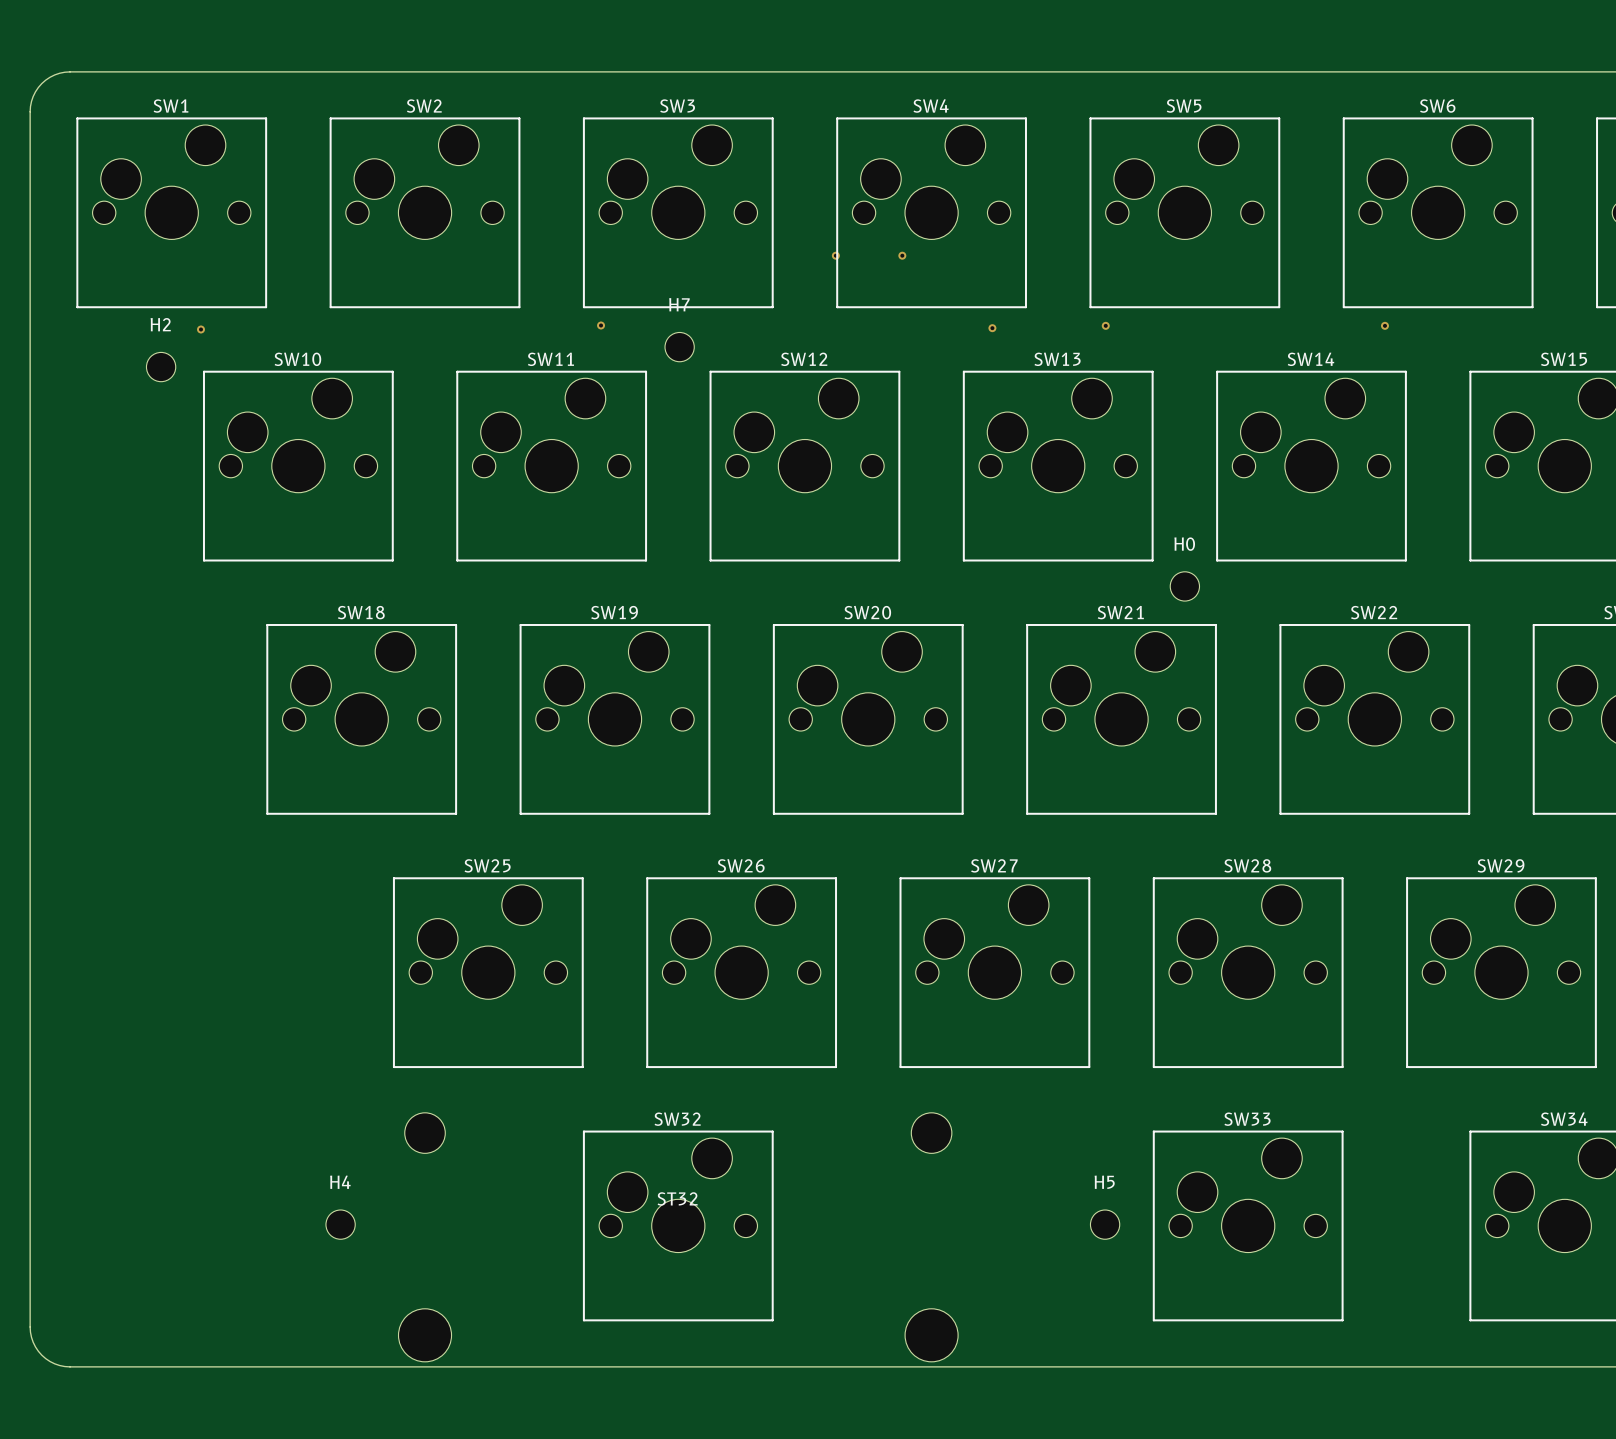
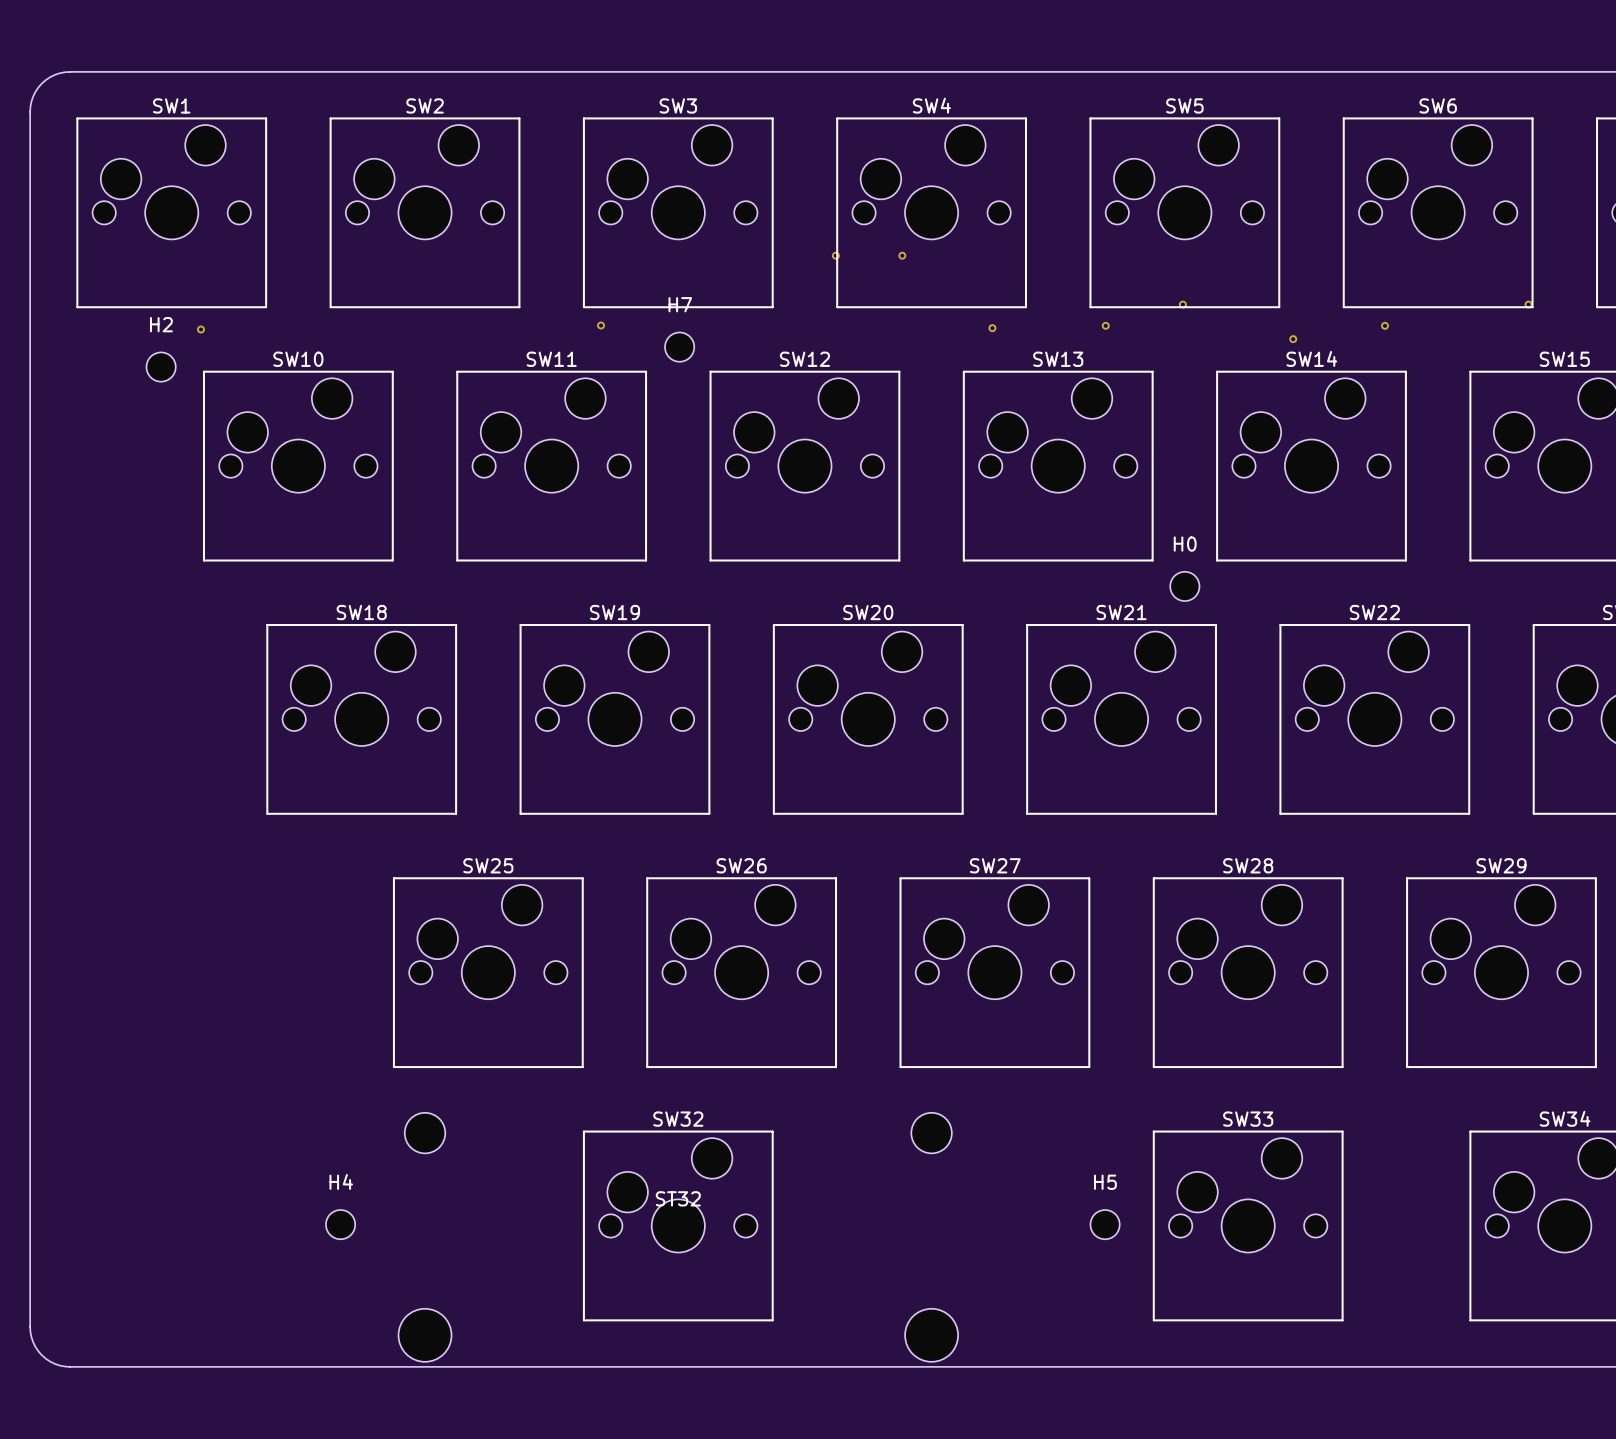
via: none -> (1182, 304)
via: none -> (1528, 304)
via: none -> (1293, 339)

